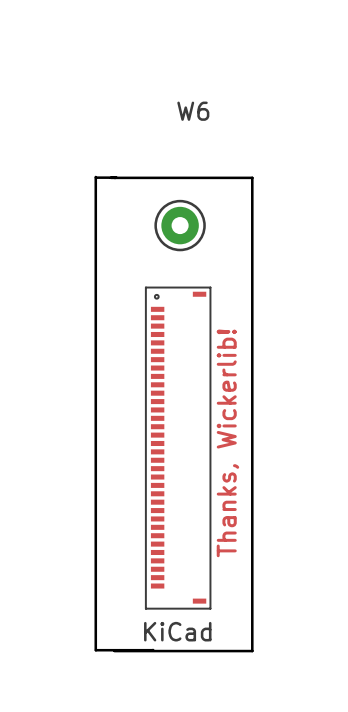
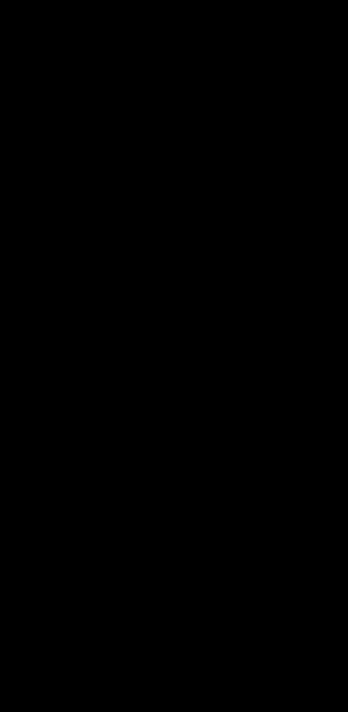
board edge: (95, 177) (95, 650) -> none
board edge: (95, 177) (116, 177) -> none
board edge: (110, 177) (252, 177) (252, 651) (114, 651) -> none
W6: (180, 225) -> none
text: Thanks, Wickerlib! (227, 443) -> none
part: (178, 448) -> none
text: KiCad (177, 631) -> none
board edge: (95, 650) (153, 650) -> none

